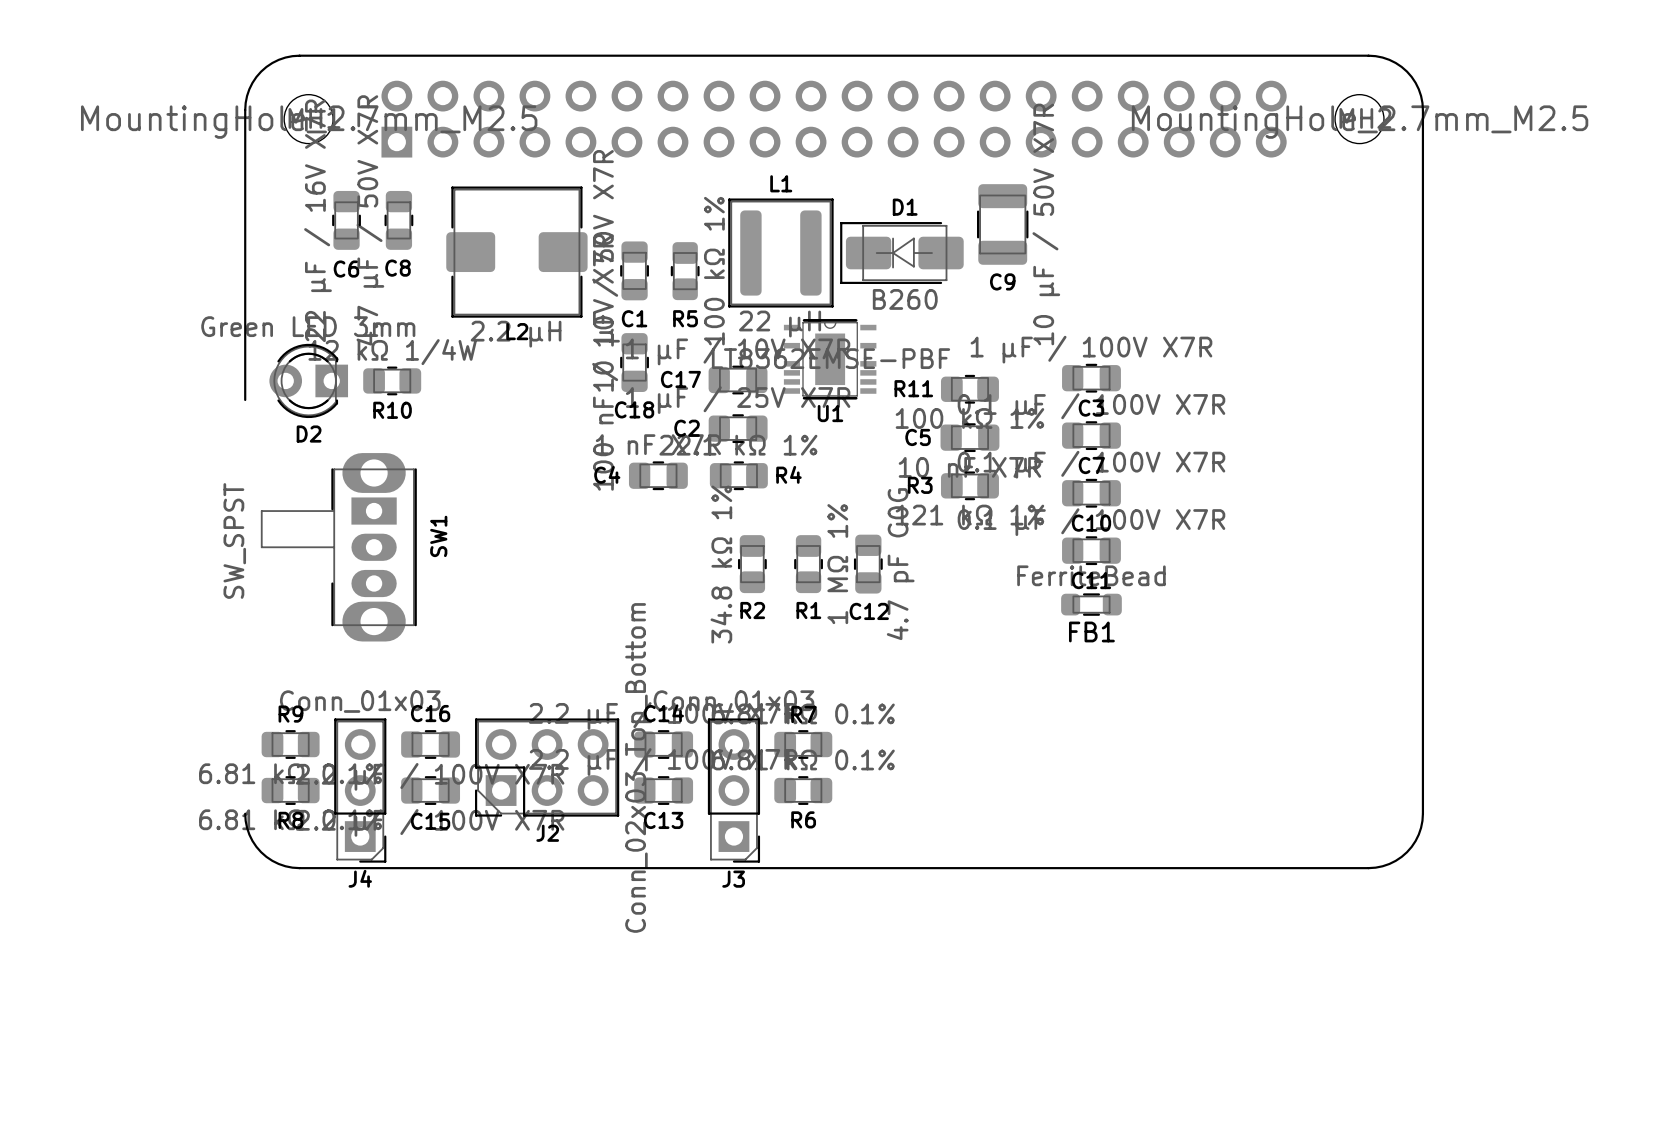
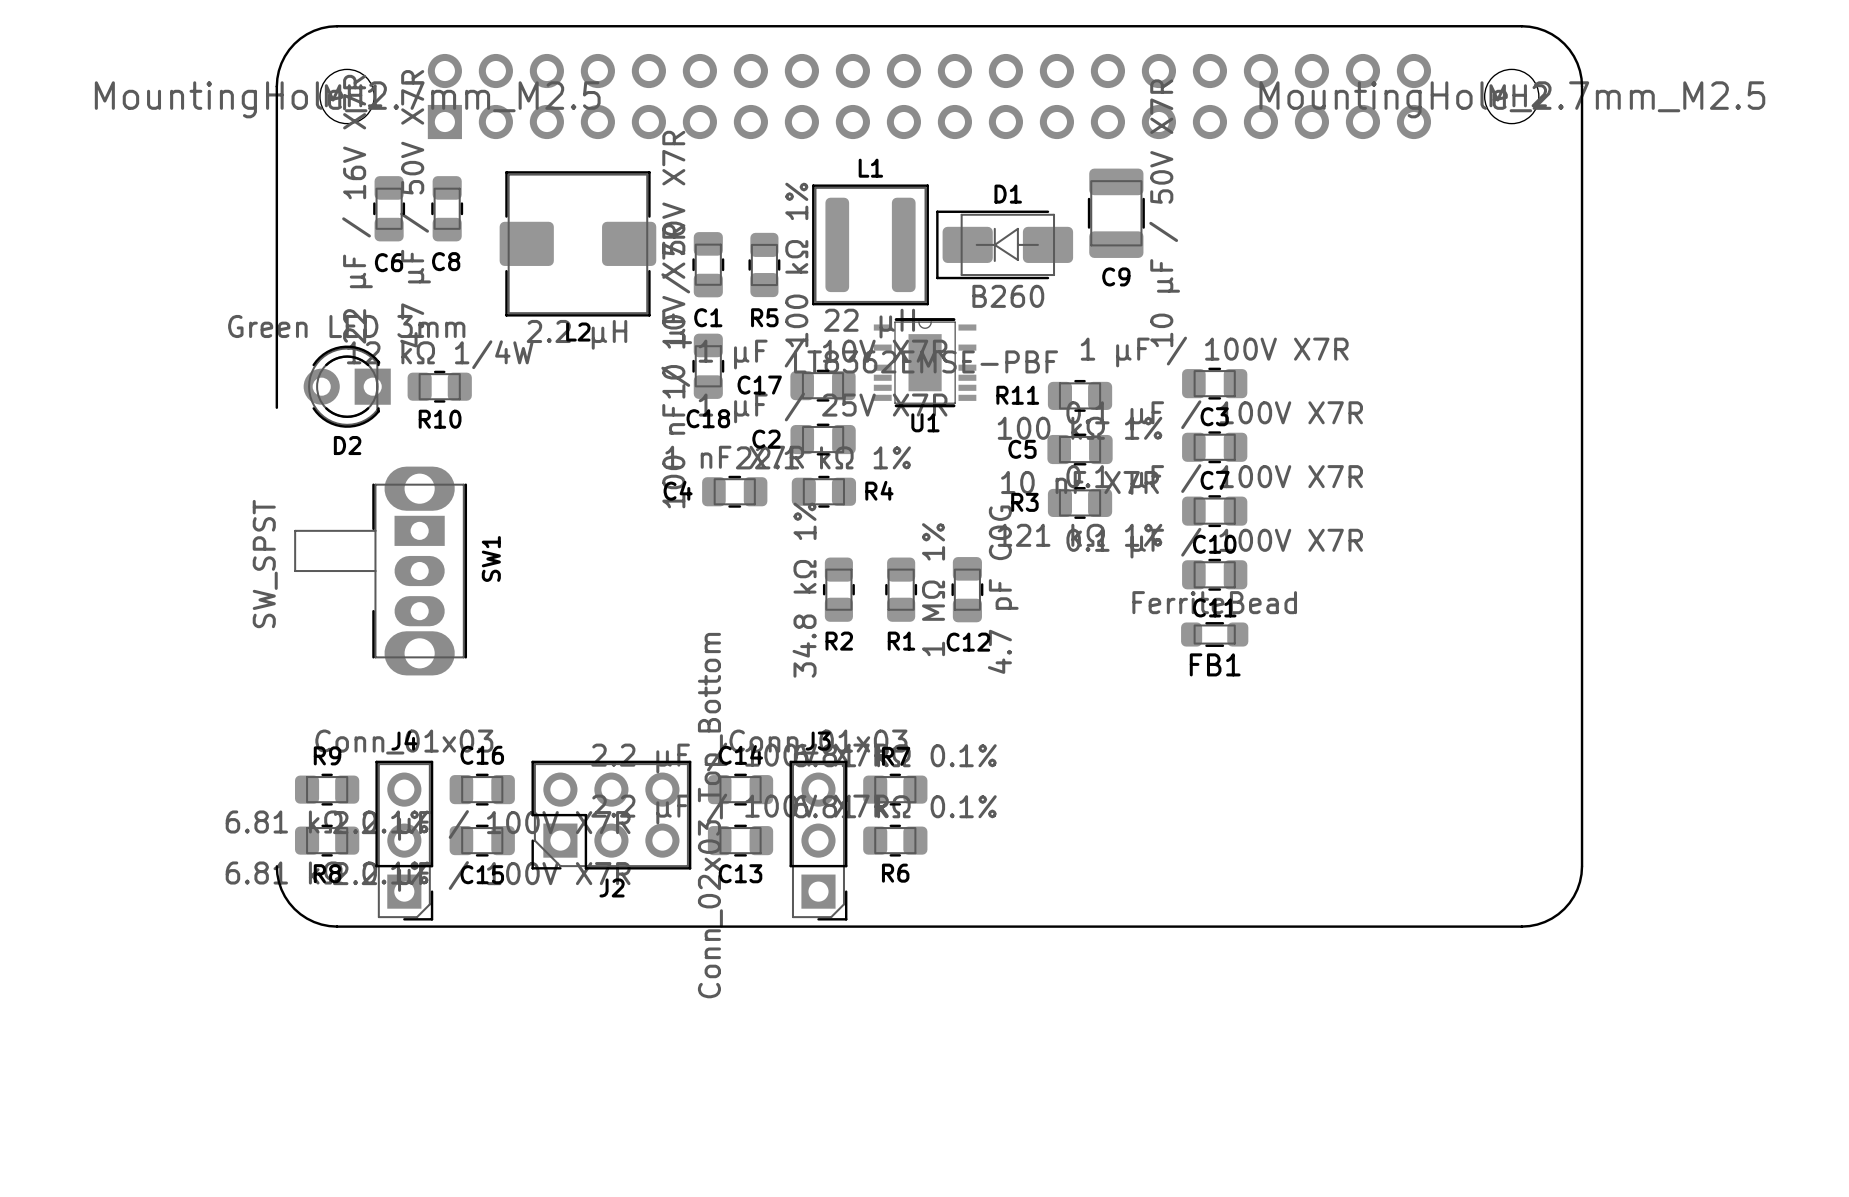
J4 name position: J4 (360, 878) -> J4 (404, 740)
J3 name position: J3 (733, 879) -> J3 (818, 741)

